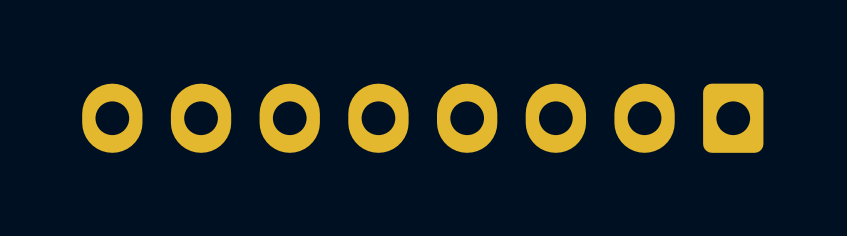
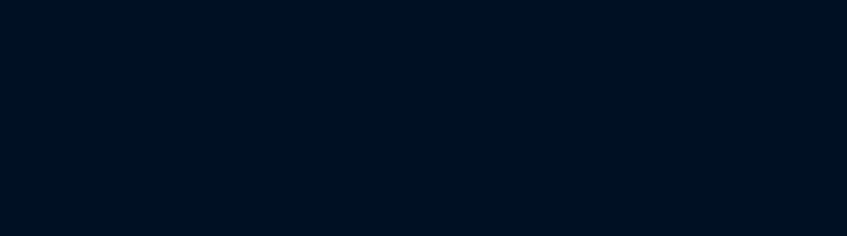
part: (422, 118) -> none

